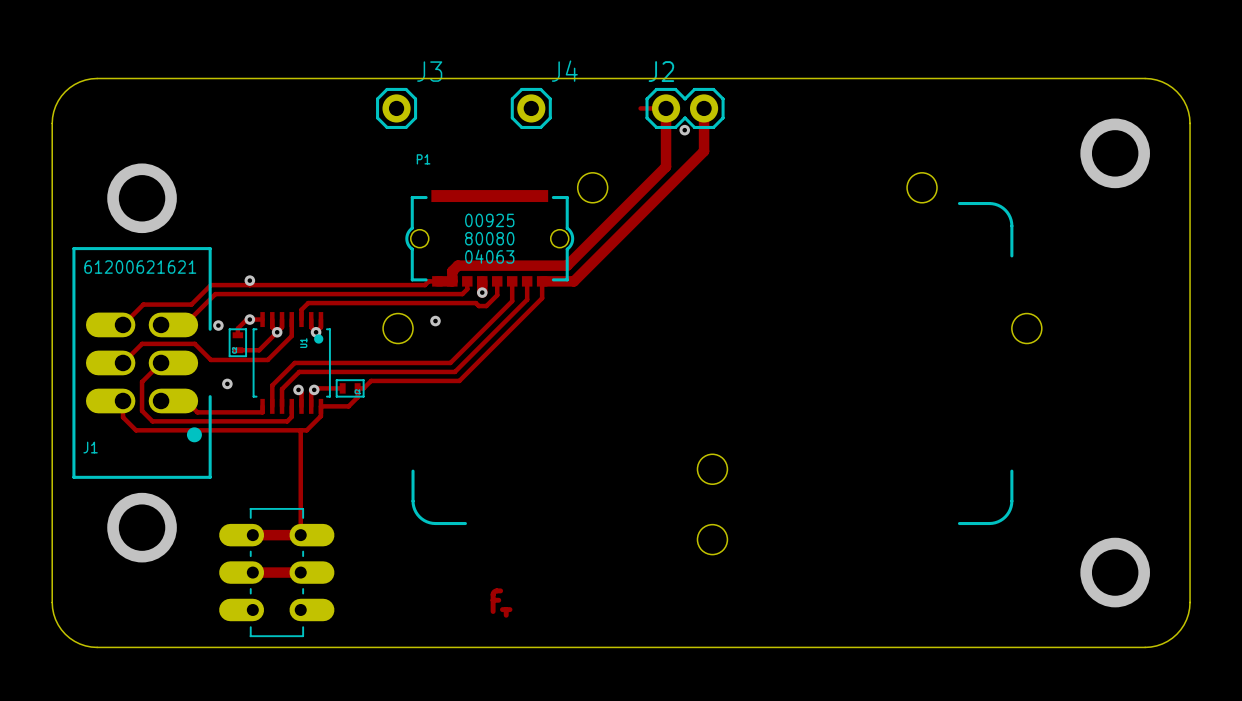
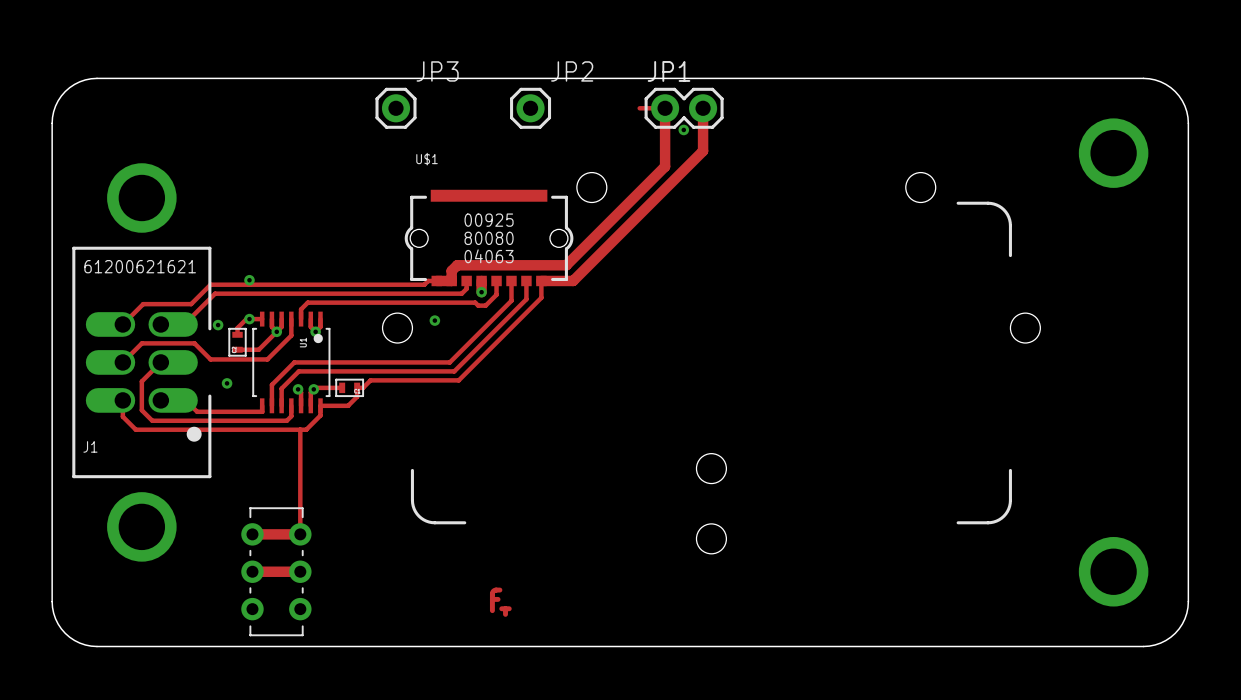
J3 name: J3 (429, 71) -> JP3 (437, 71)
J4 name: J4 (564, 71) -> JP2 (572, 71)
J2 name: J2 (661, 71) -> JP1 (669, 71)
P1 name: P1 (423, 159) -> U$1 (427, 159)
part footprint: [219, 507, 335, 638] -> [241, 507, 312, 637]

